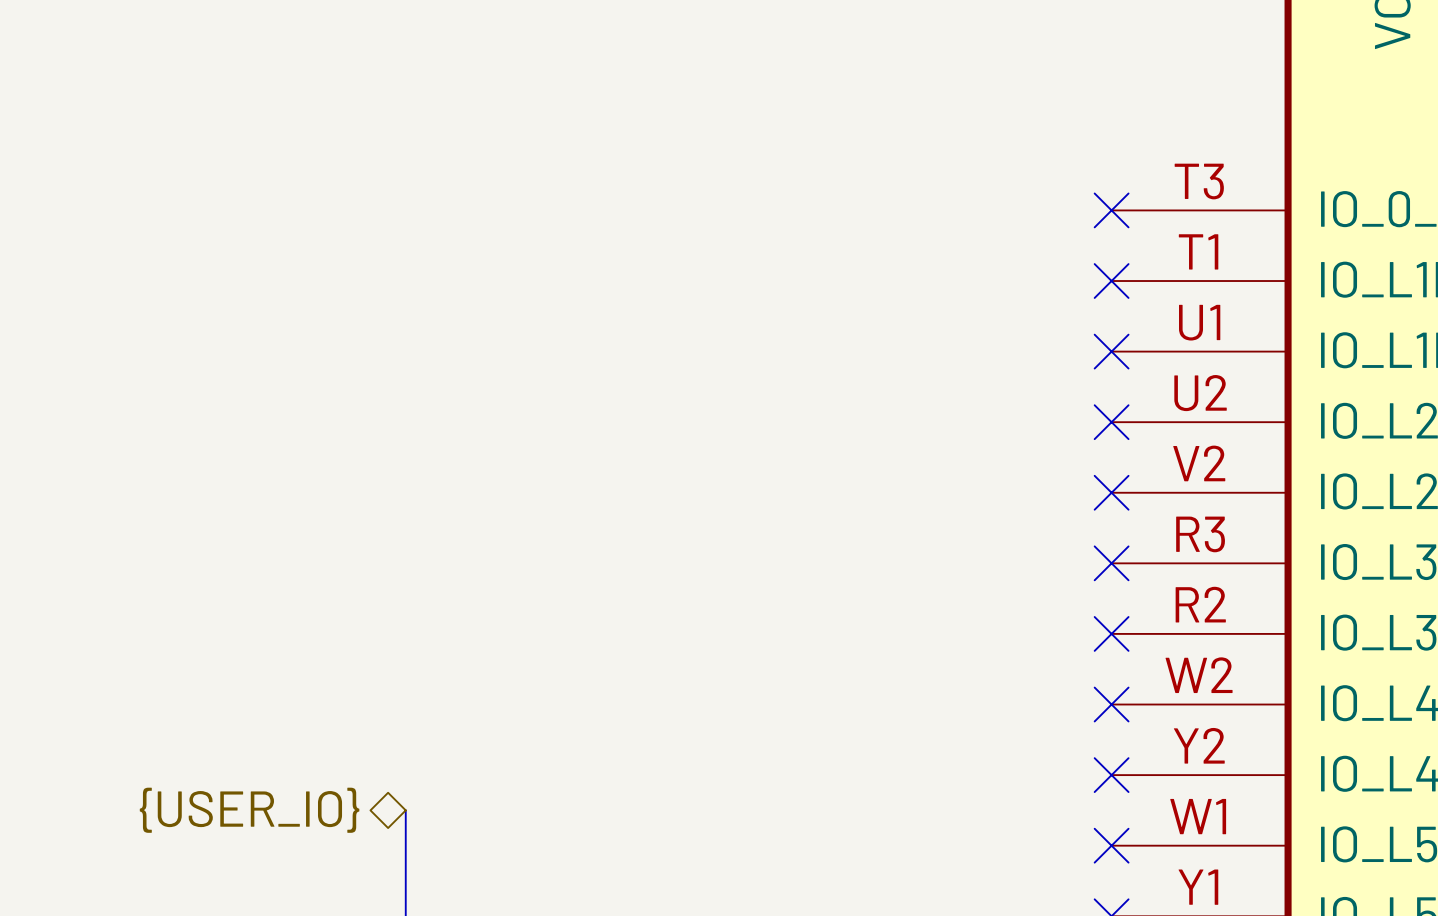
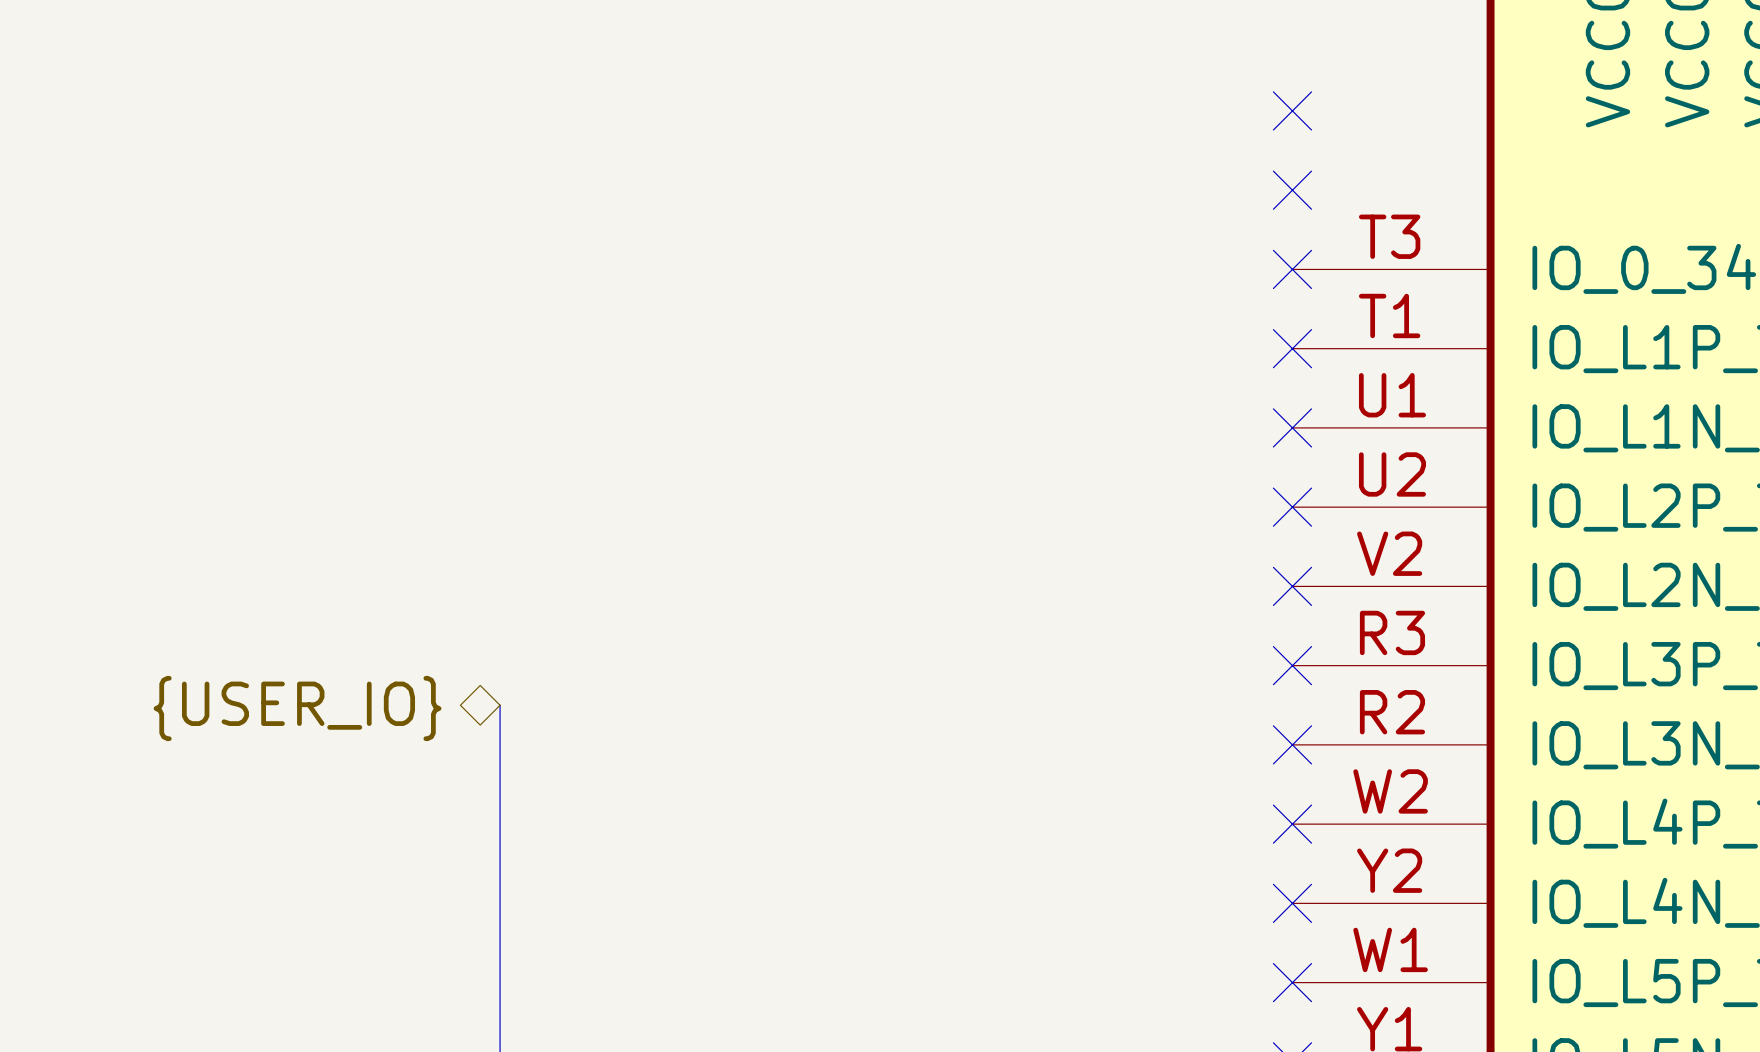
no-connect mark: none -> (1292, 110)
no-connect mark: none -> (1292, 190)
bus: none -> (500, 705) (500, 942)
hierarchical label position: {USER_IO} (249, 810) -> {USER_IO} (297, 708)

